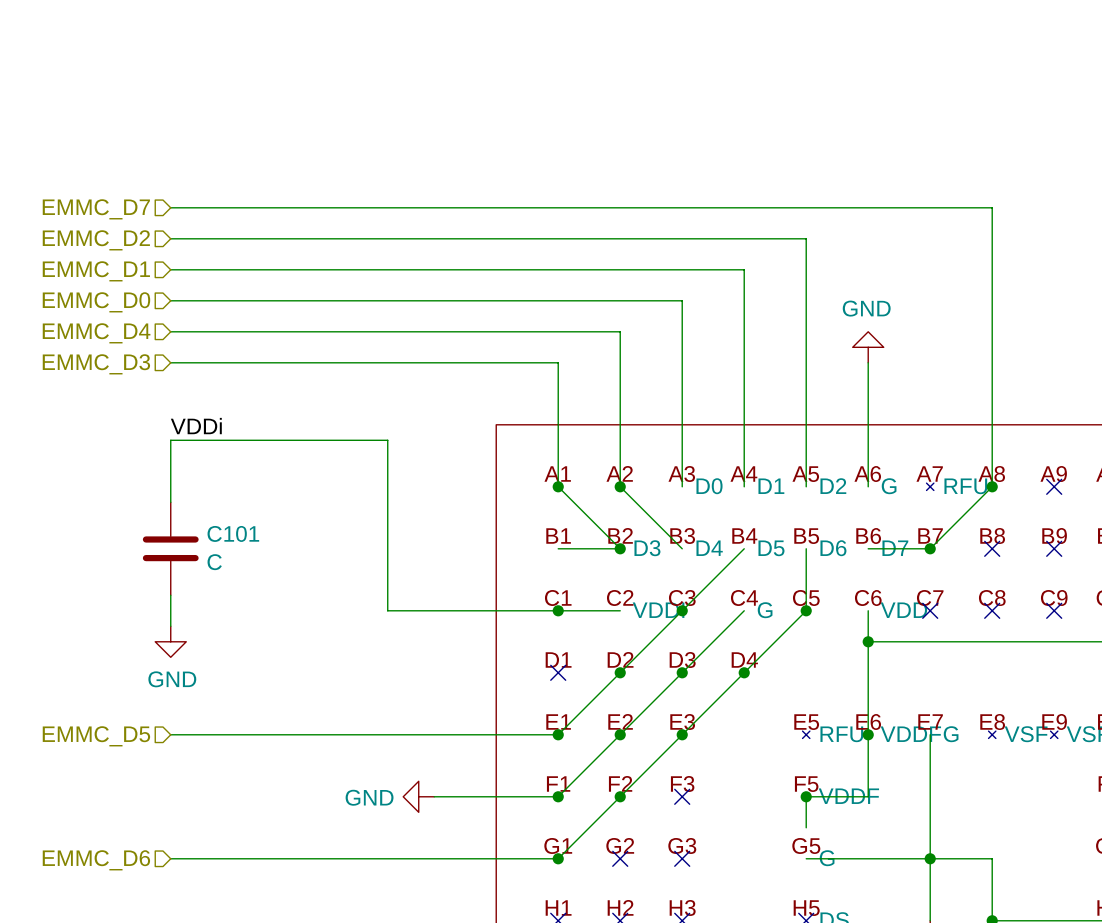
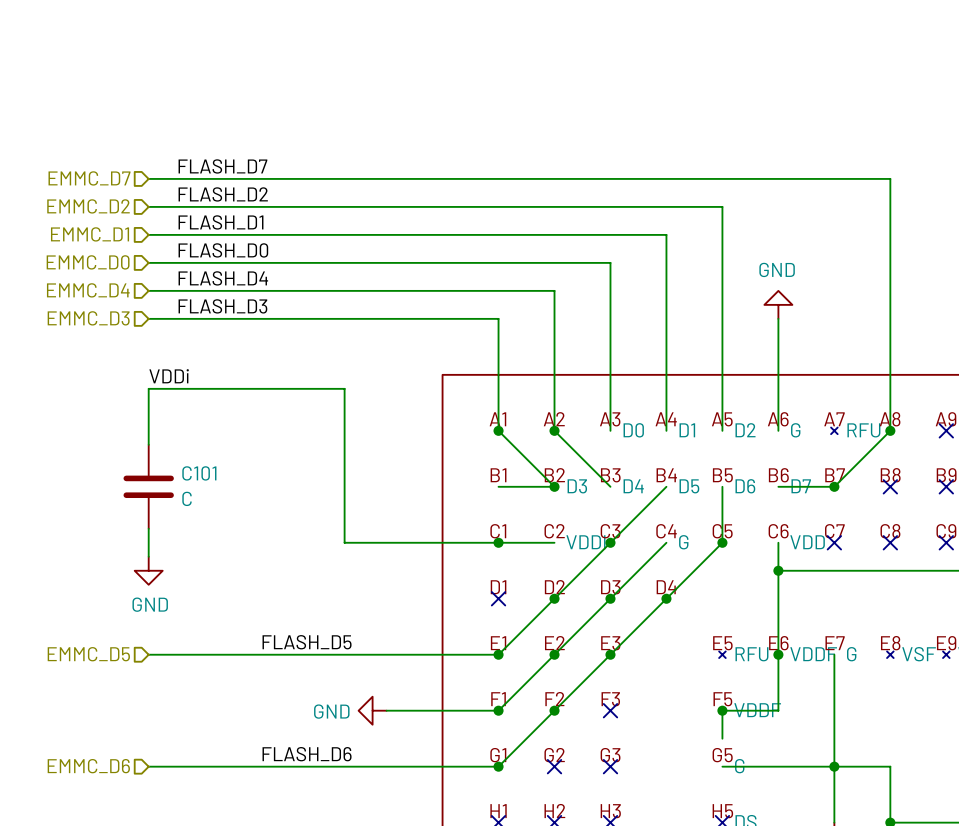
label: none -> FLASH_D7 (222, 166)
label: none -> FLASH_D2 (223, 194)
label: none -> FLASH_D1 (221, 222)
label: none -> FLASH_D0 (223, 250)
label: none -> FLASH_D4 (223, 278)
label: none -> FLASH_D3 (222, 306)
label: none -> FLASH_D5 (307, 642)
label: none -> FLASH_D6 (307, 754)

